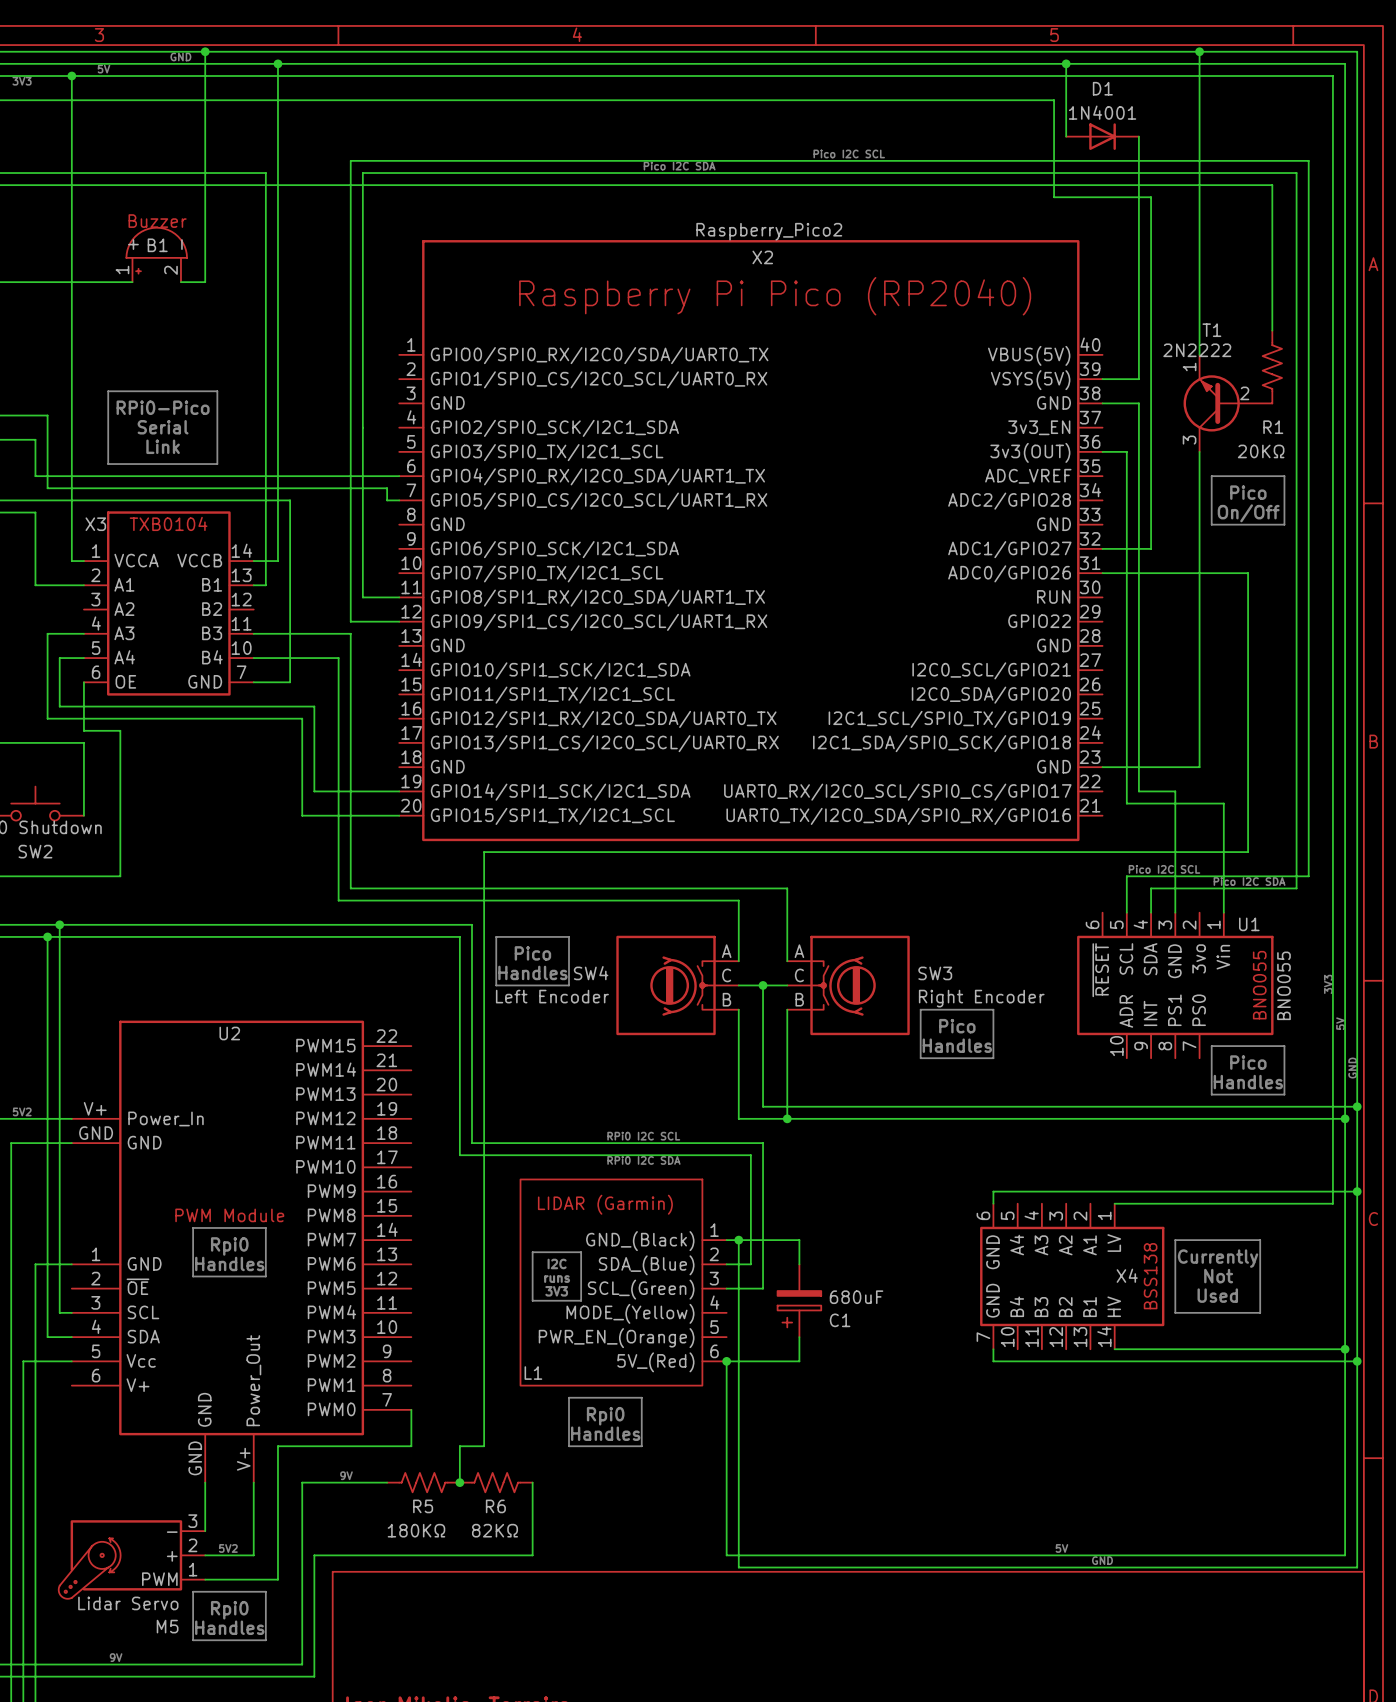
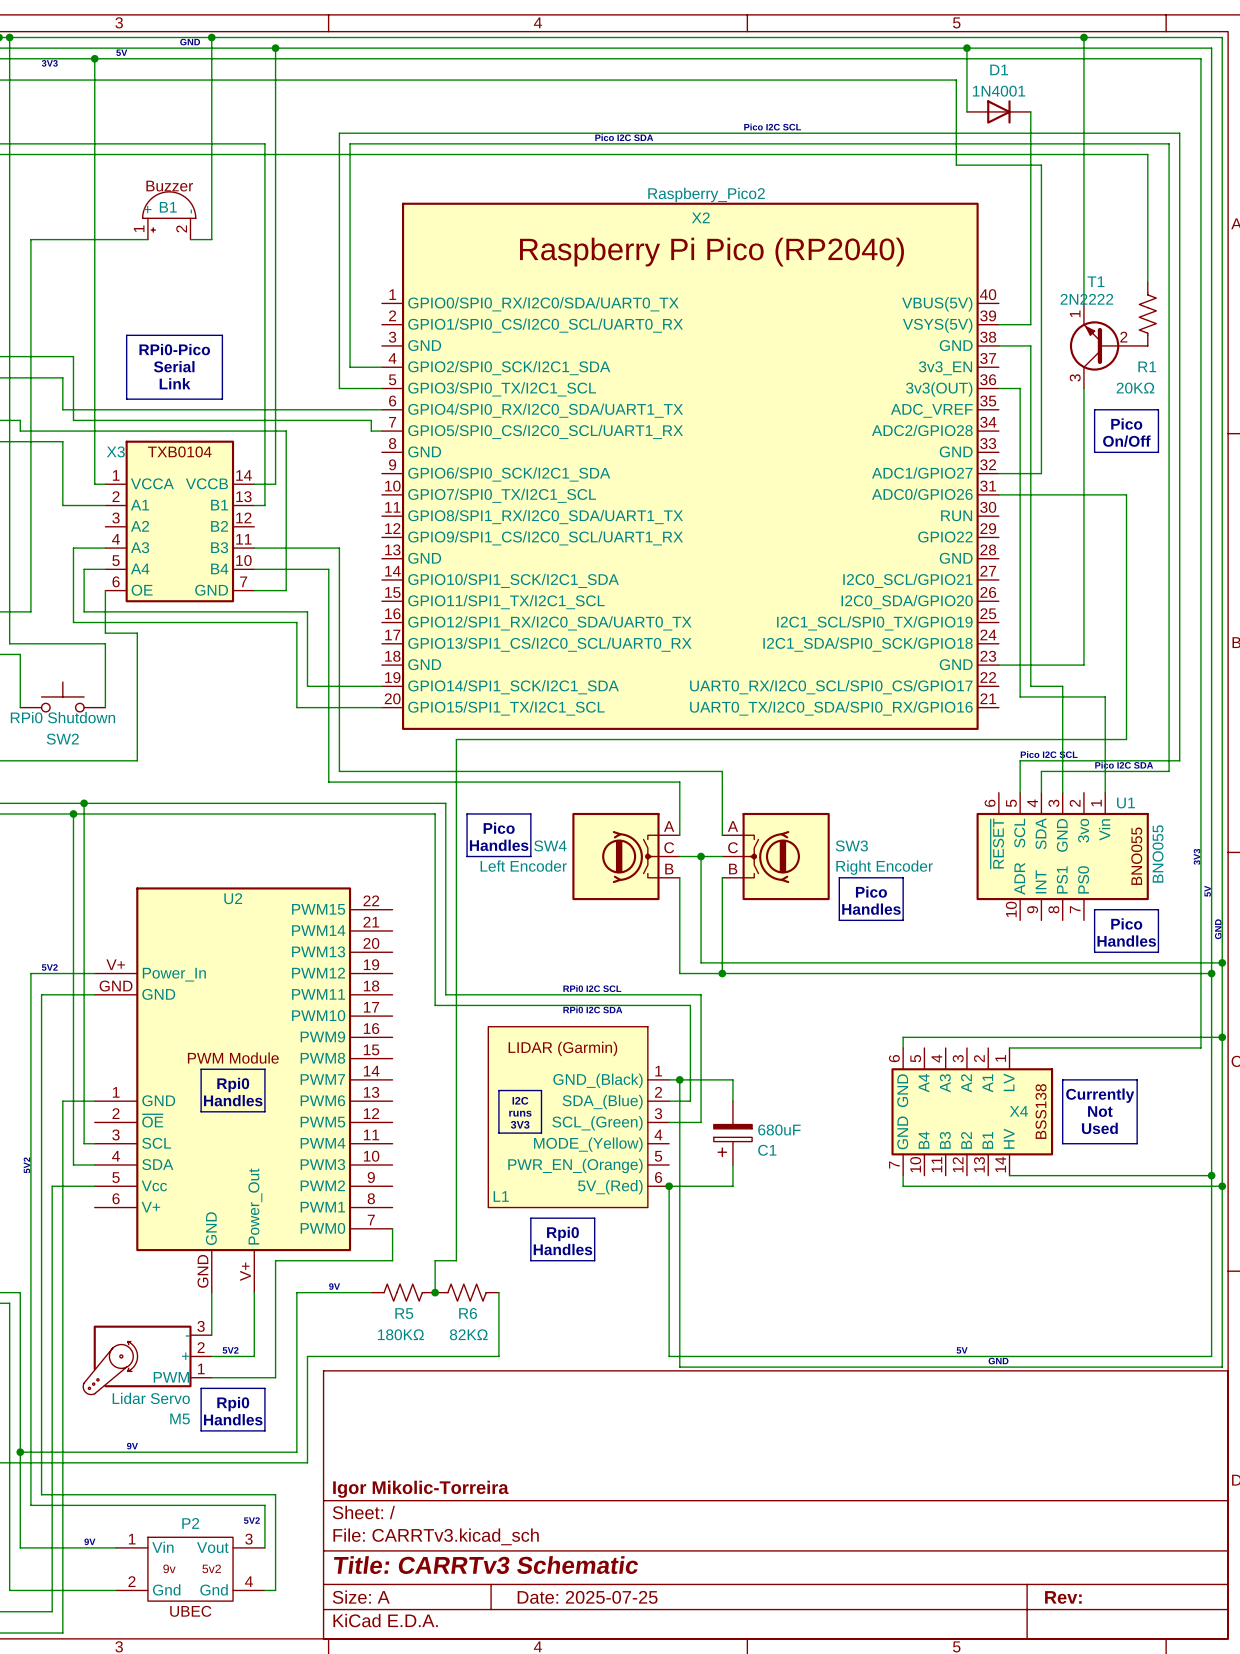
wire: (362, 427) (362, 597) (399, 597) -> (350, 367) (381, 367)
wire: (350, 451) (350, 621) (399, 621) -> (339, 388) (381, 388)

